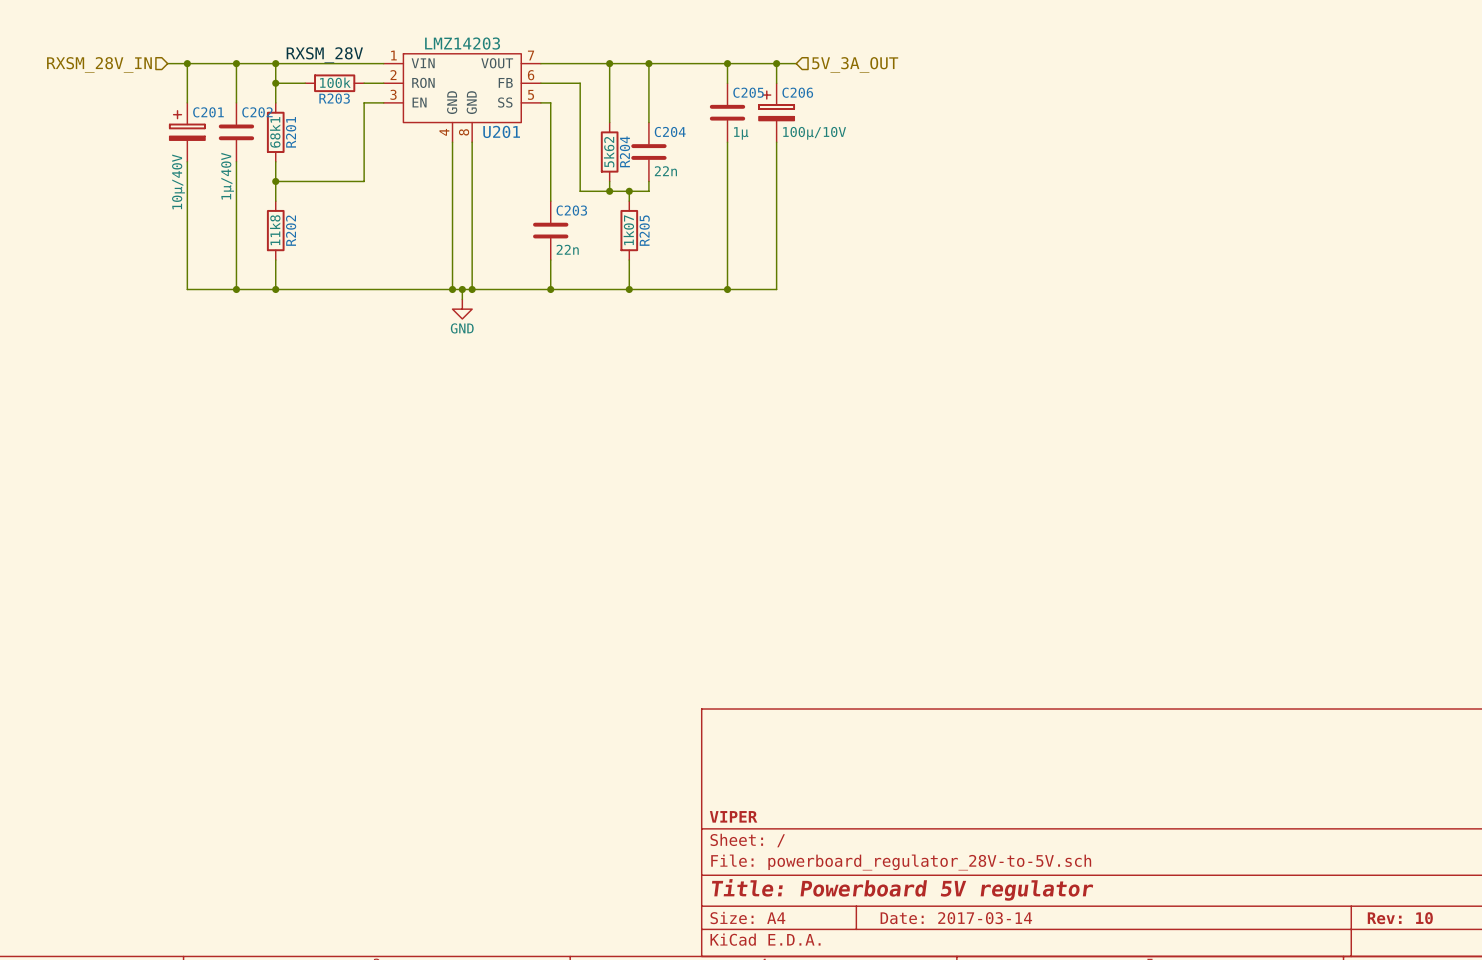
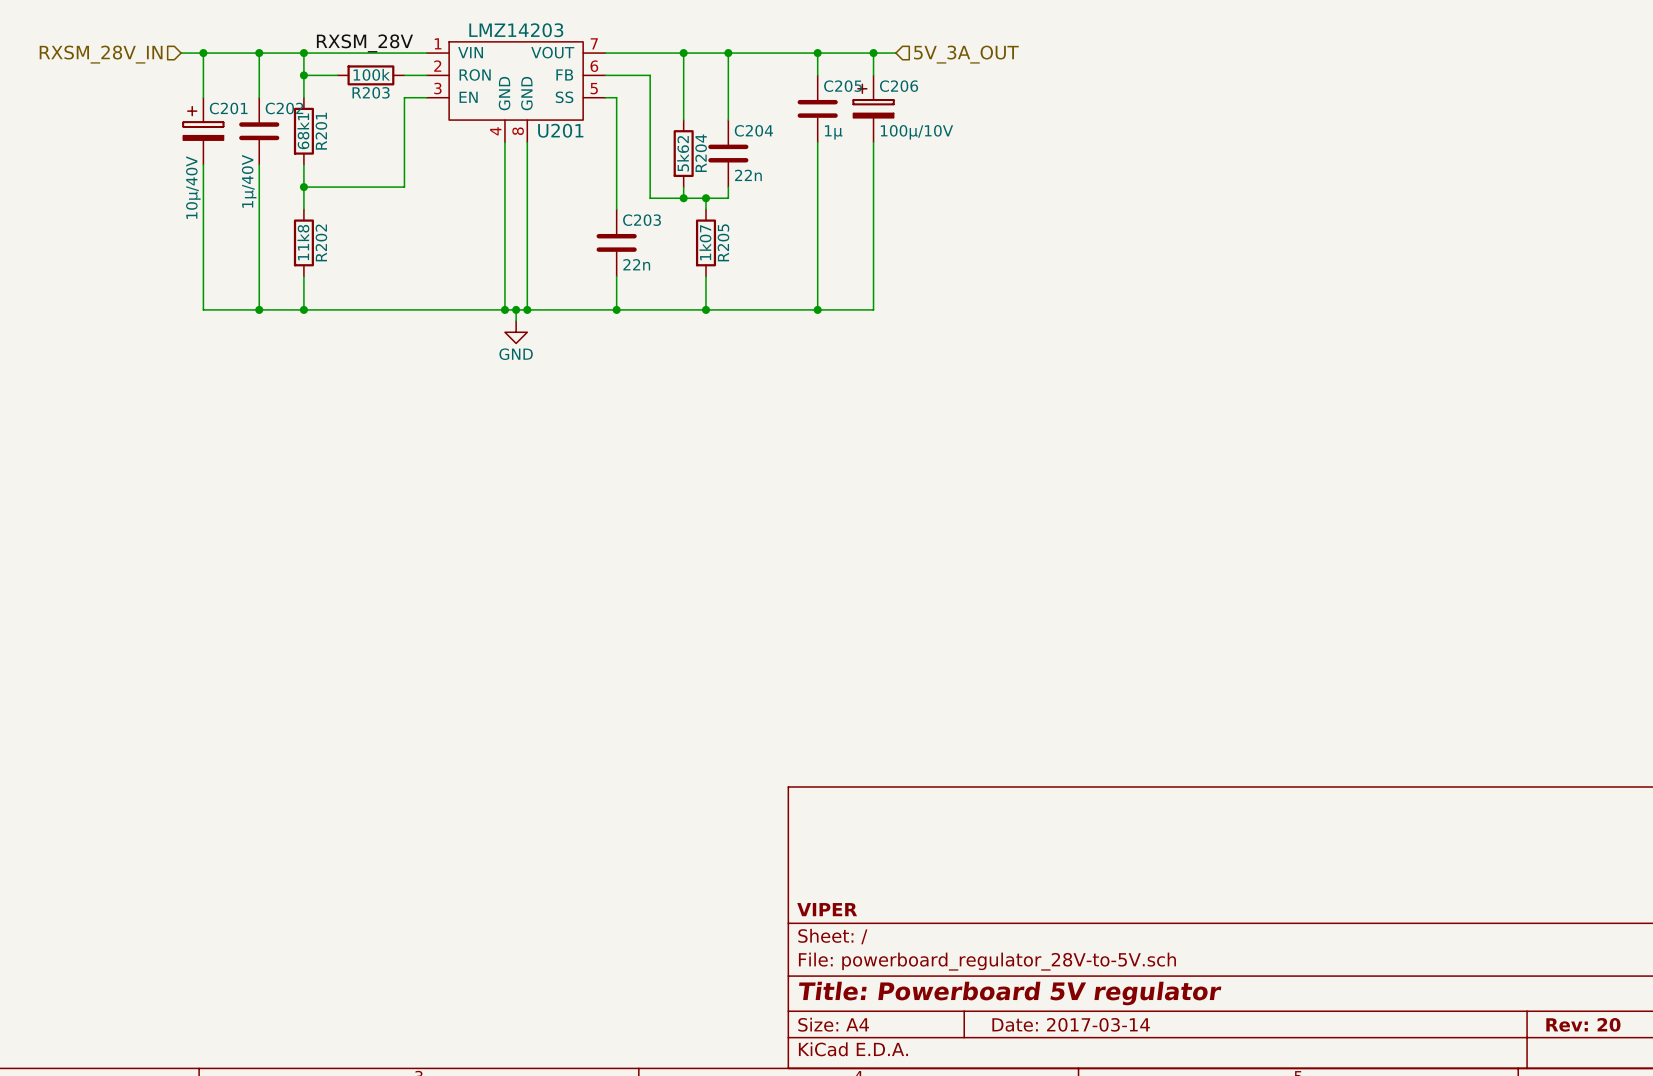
title block: Rev: 10 (1400, 918) -> Rev: 20 (1583, 1024)

